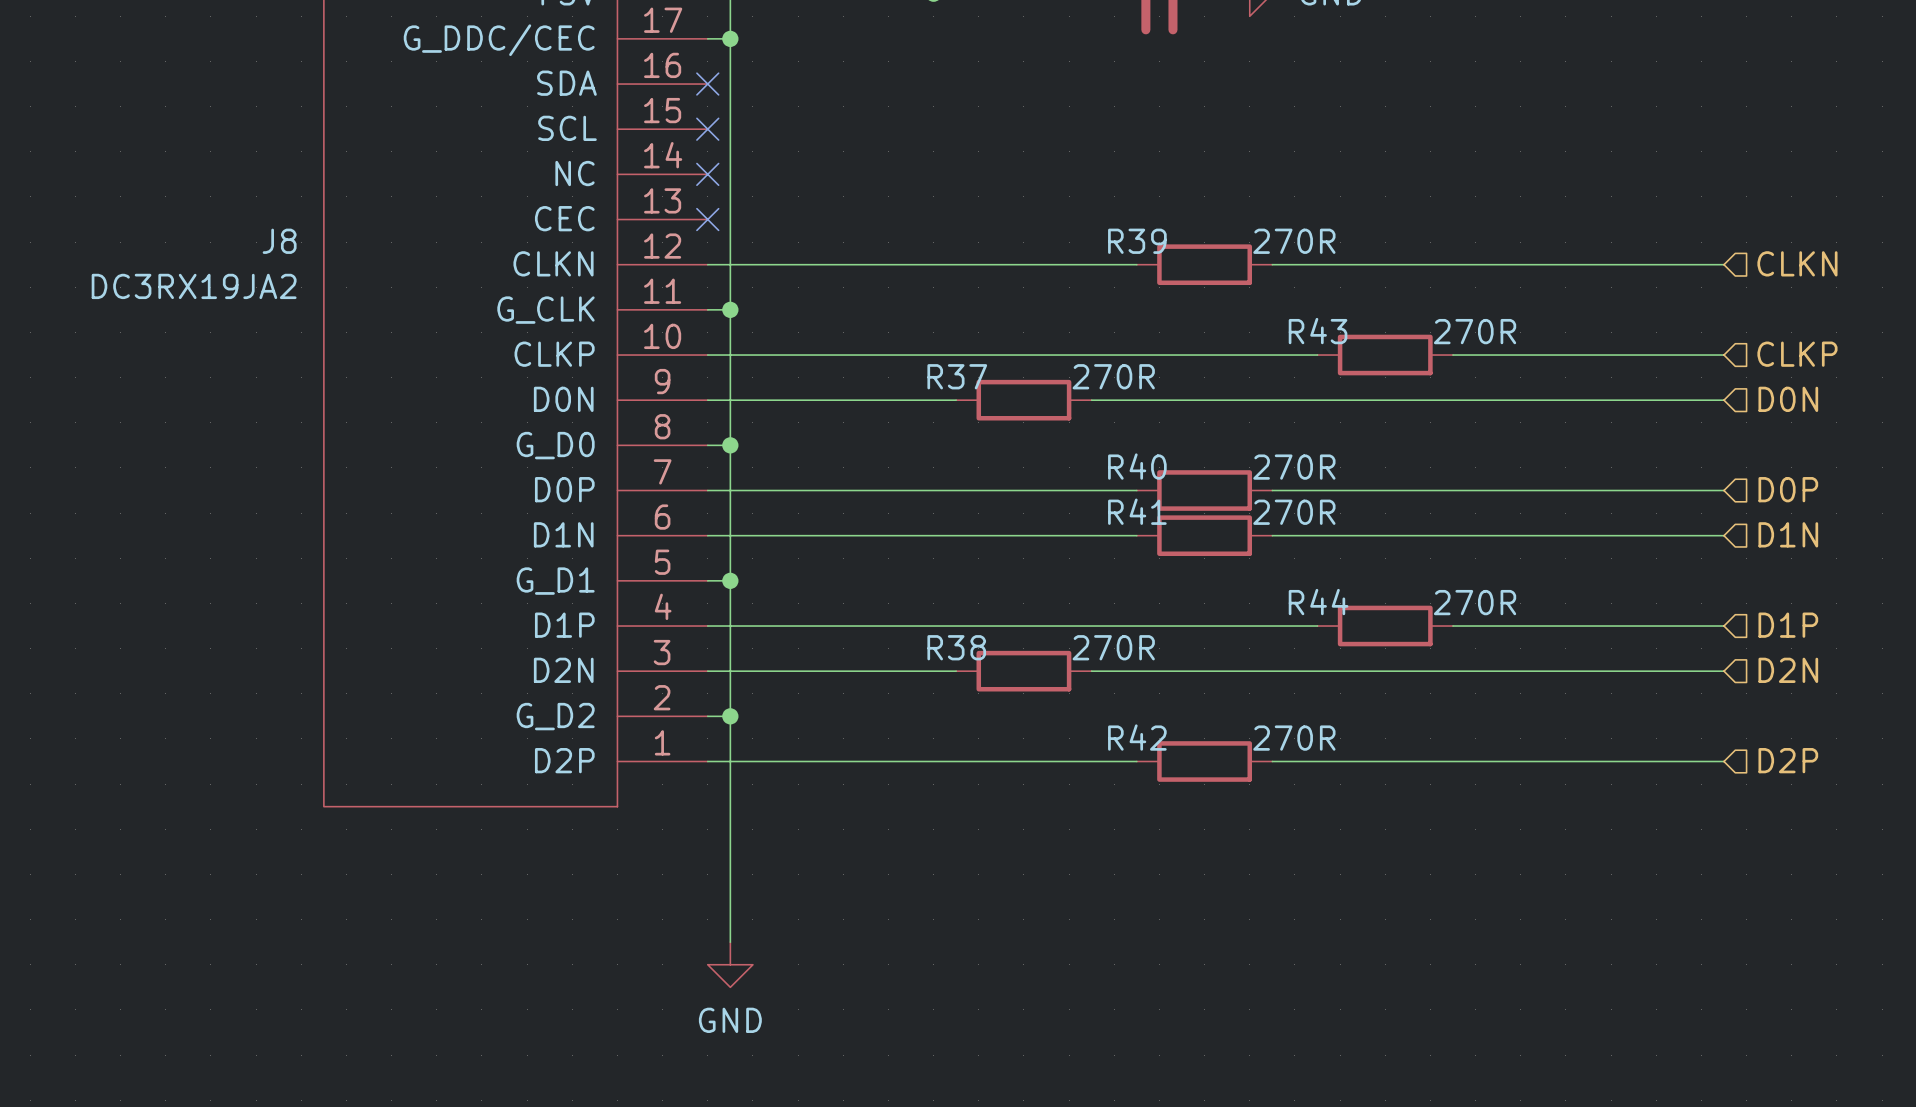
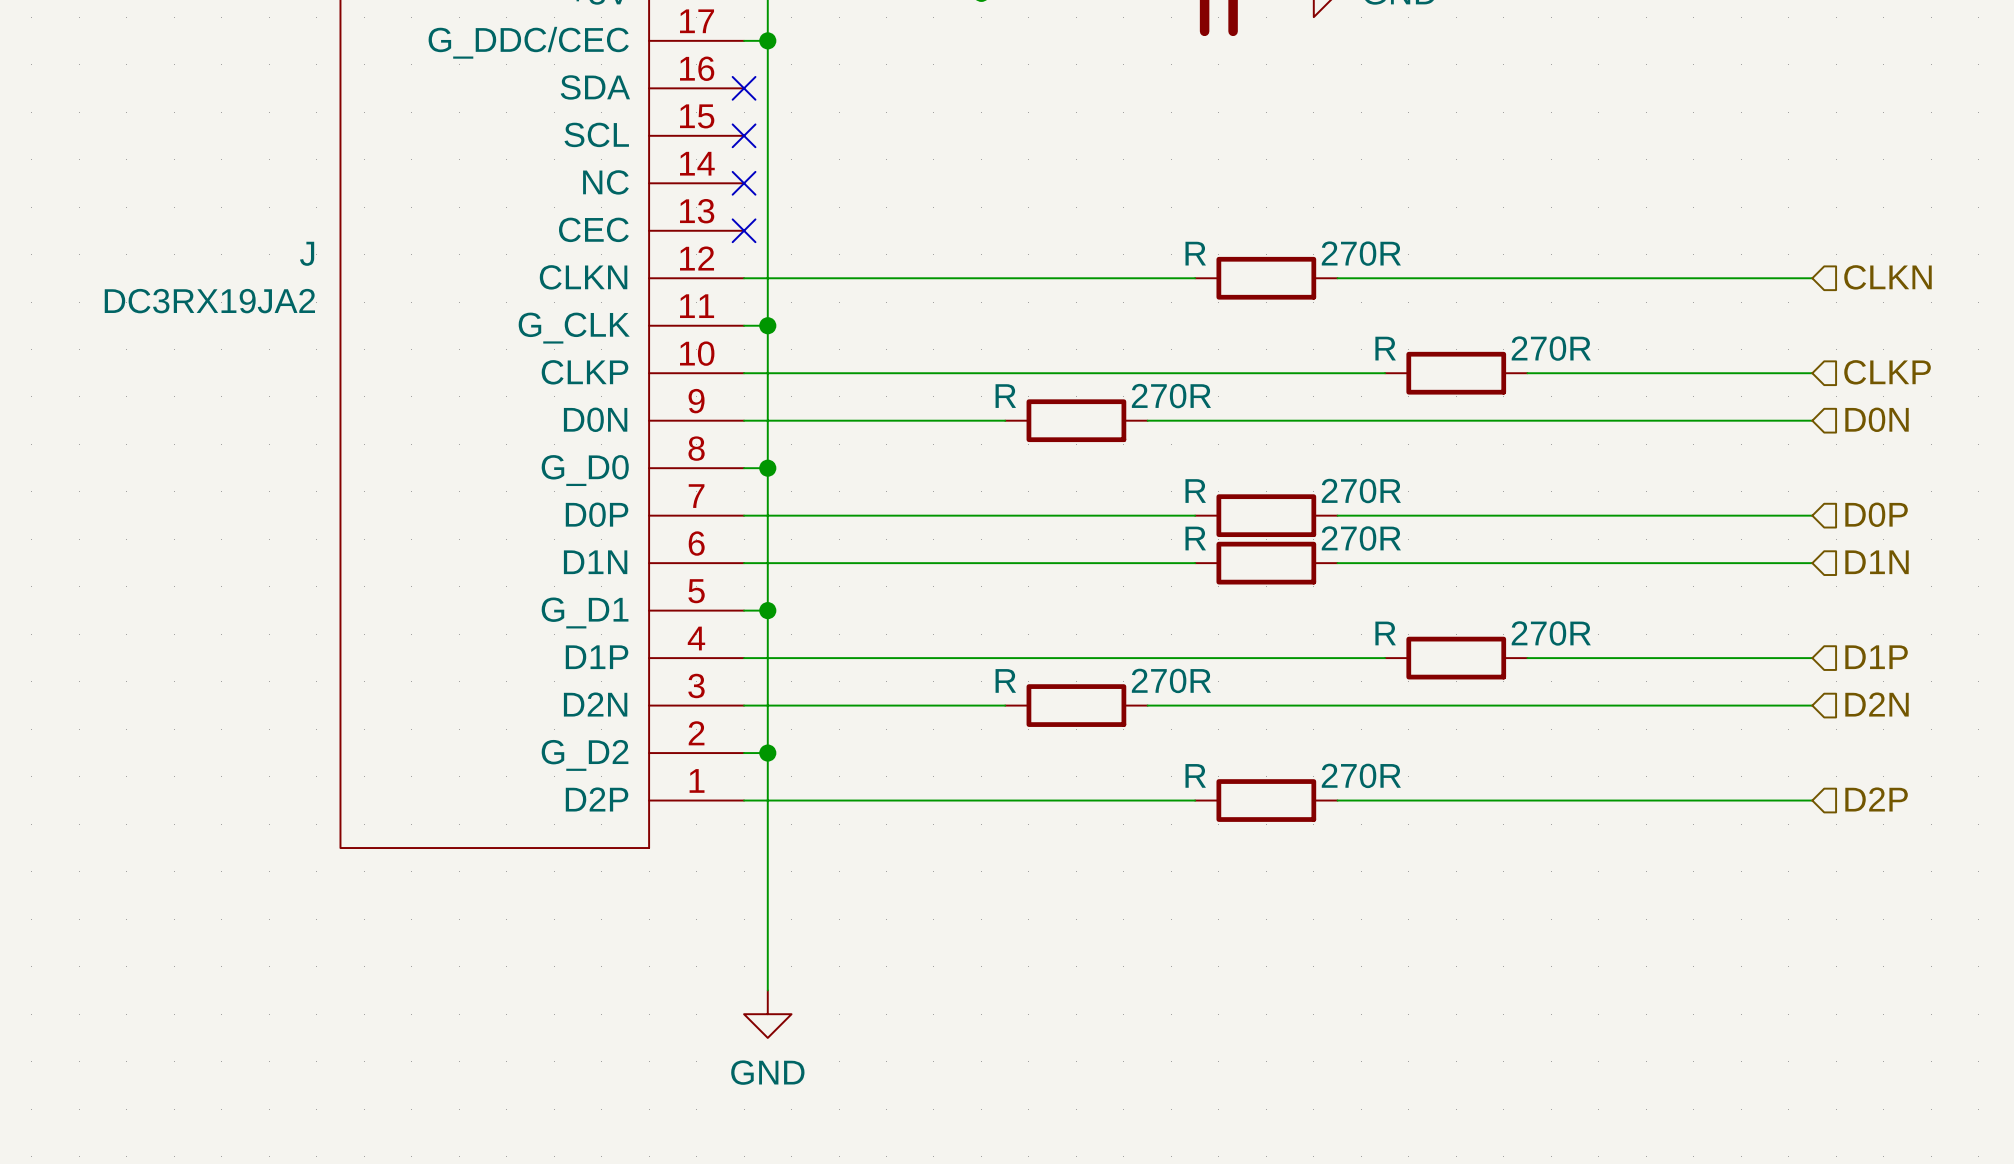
J8 name: J8 (279, 241) -> J (307, 253)
R39 name: R39 (1137, 241) -> R (1195, 253)
R43 name: R43 (1318, 331) -> R (1385, 348)
R37 name: R37 (957, 376) -> R (1005, 396)
R40 name: R40 (1137, 466) -> R (1195, 491)
R41 name: R41 (1137, 511) -> R (1195, 538)
R44 name: R44 (1318, 602) -> R (1385, 633)
R38 name: R38 (956, 647) -> R (1005, 680)
R42 name: R42 (1137, 737) -> R (1195, 775)

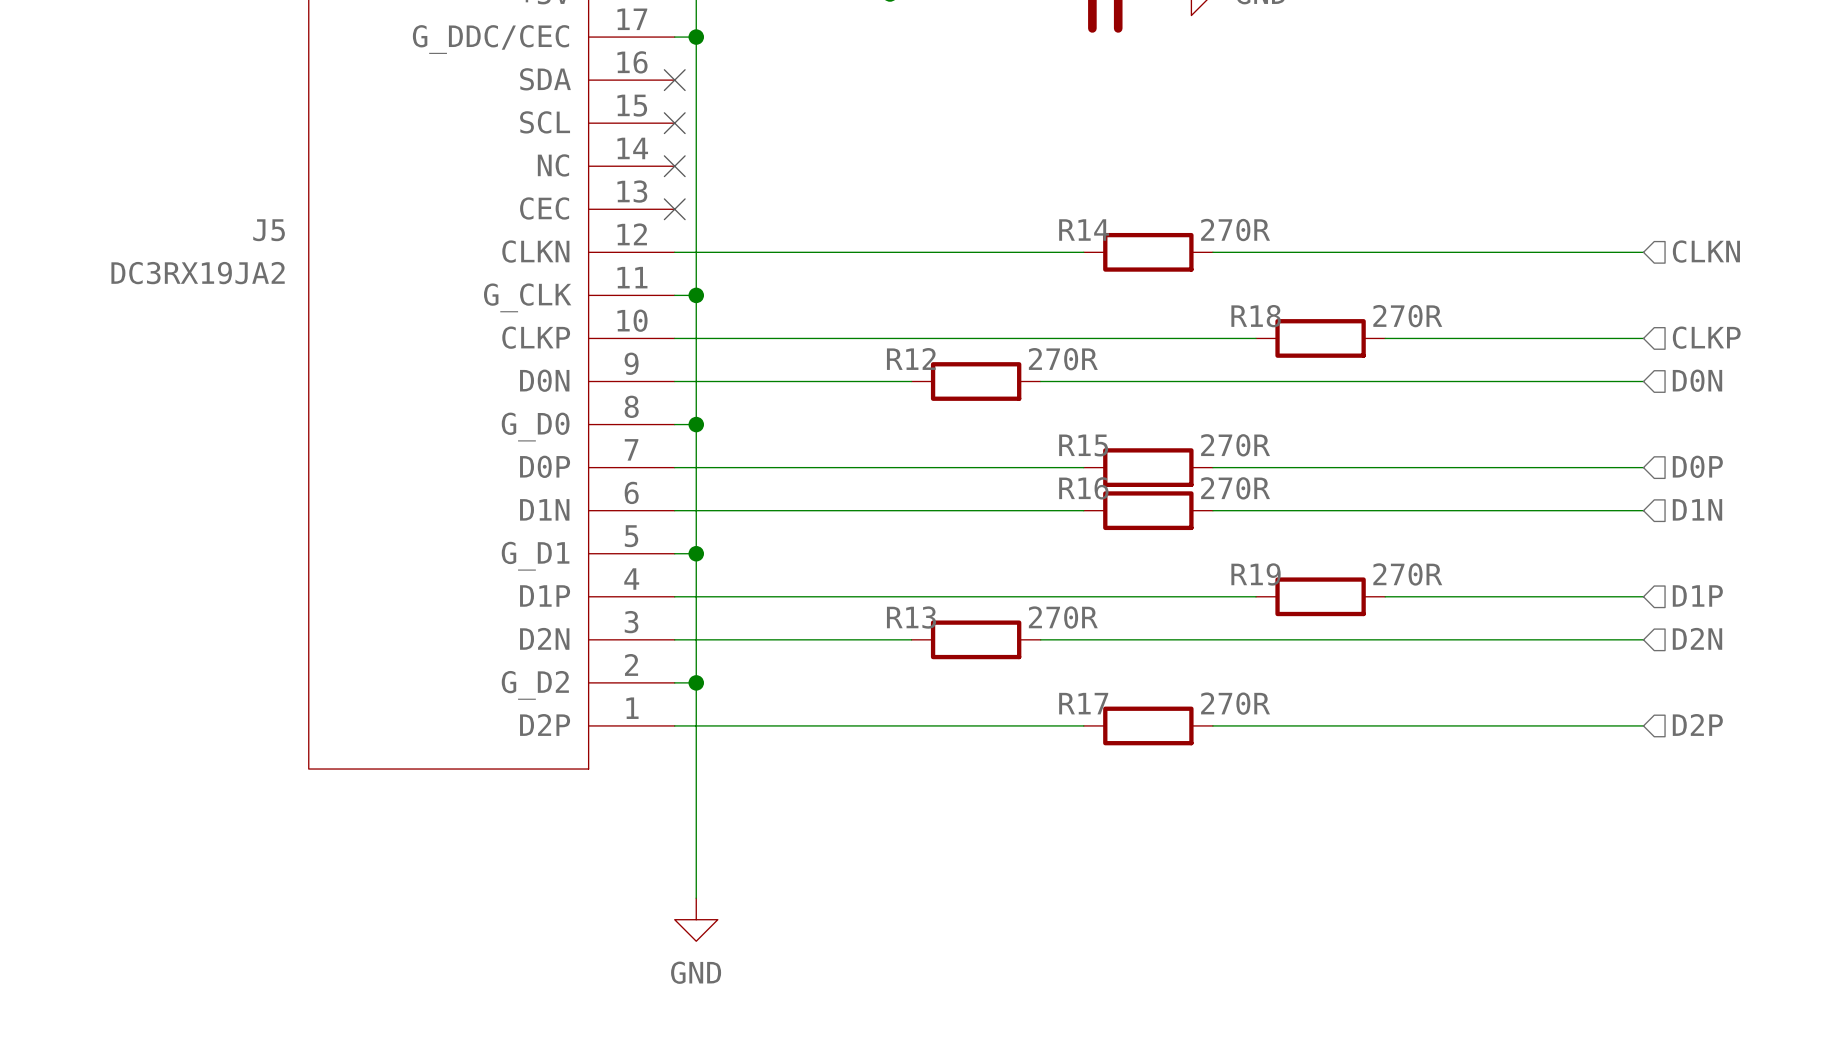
J name: J (307, 253) -> J5 (269, 230)
R name: R (1195, 253) -> R14 (1084, 230)
R name: R (1385, 348) -> R18 (1256, 316)
R name: R (1005, 396) -> R12 (911, 358)
R name: R (1195, 491) -> R15 (1083, 445)
R name: R (1195, 538) -> R16 (1083, 488)
R name: R (1385, 633) -> R19 (1256, 574)
R name: R (1005, 680) -> R13 (911, 617)
R name: R (1195, 775) -> R17 (1083, 703)

